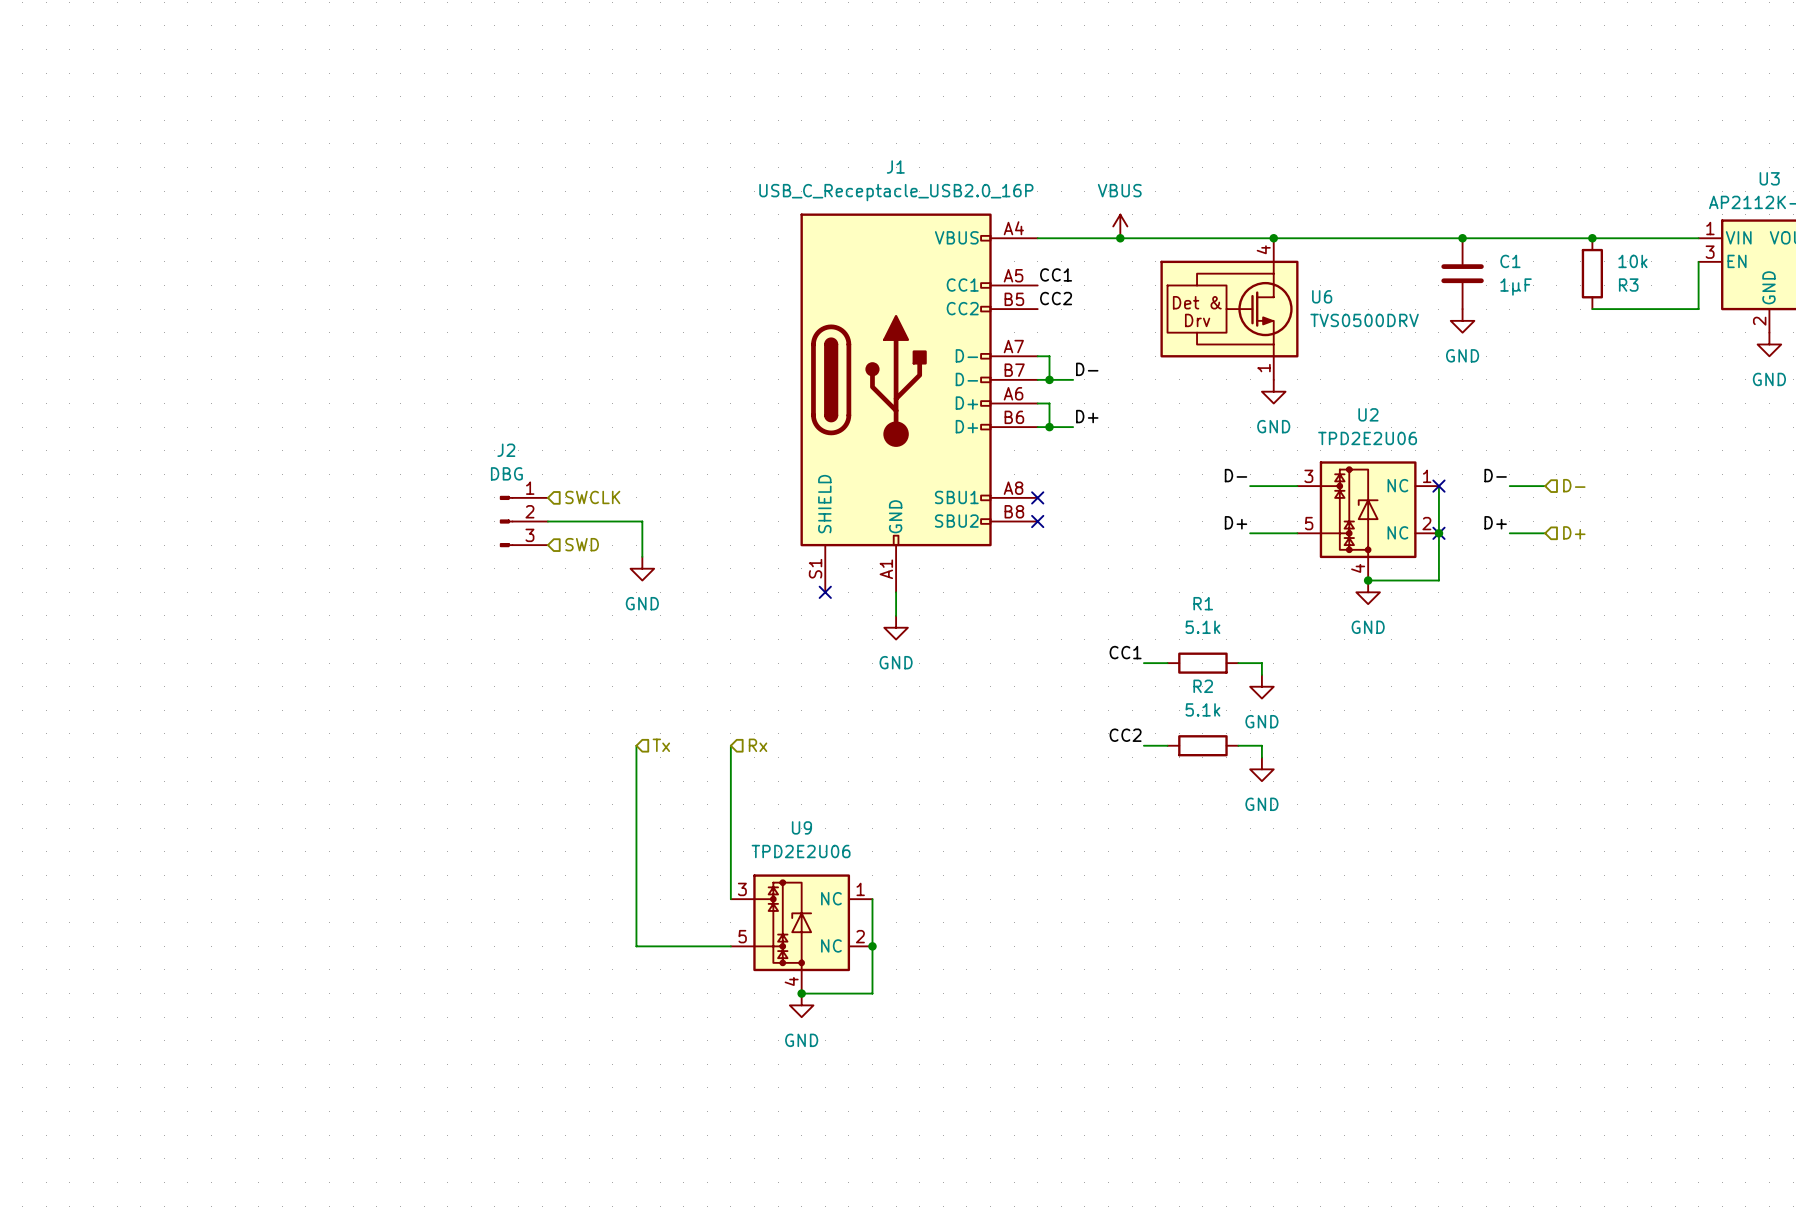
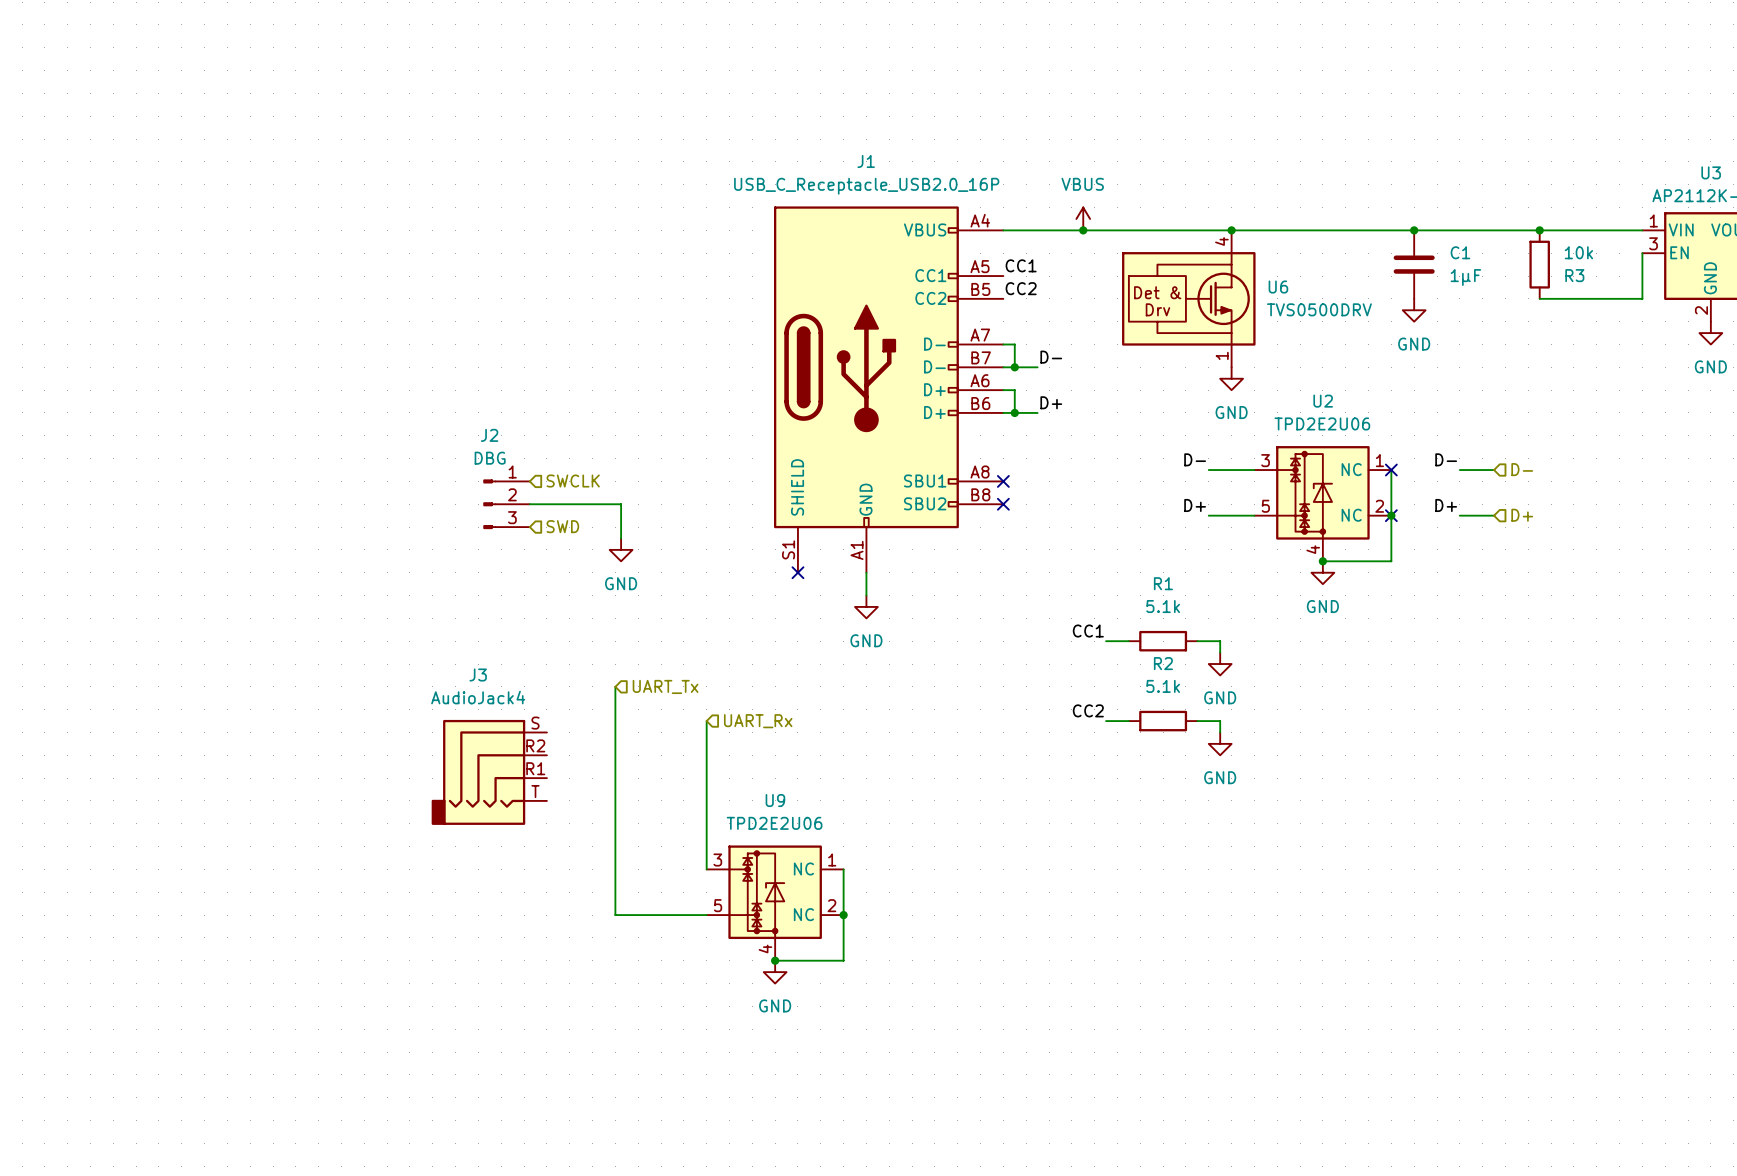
wire: none -> (615, 686) (615, 721)
hierarchical label: none -> UART_Tx (665, 686)
hierarchical label: Tx (661, 745) -> none
hierarchical label: Rx (758, 745) -> UART_Rx (758, 721)
J3: none -> AudioJack4 (489, 772)

